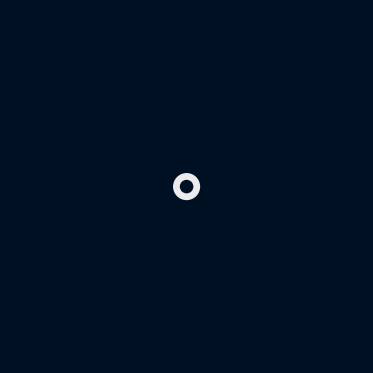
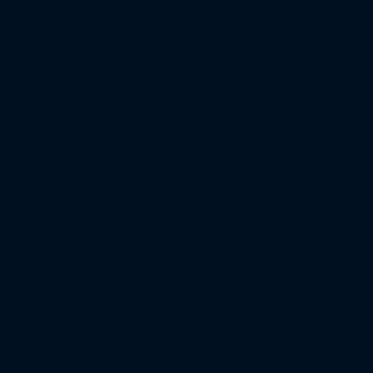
via: (186, 186) -> none

